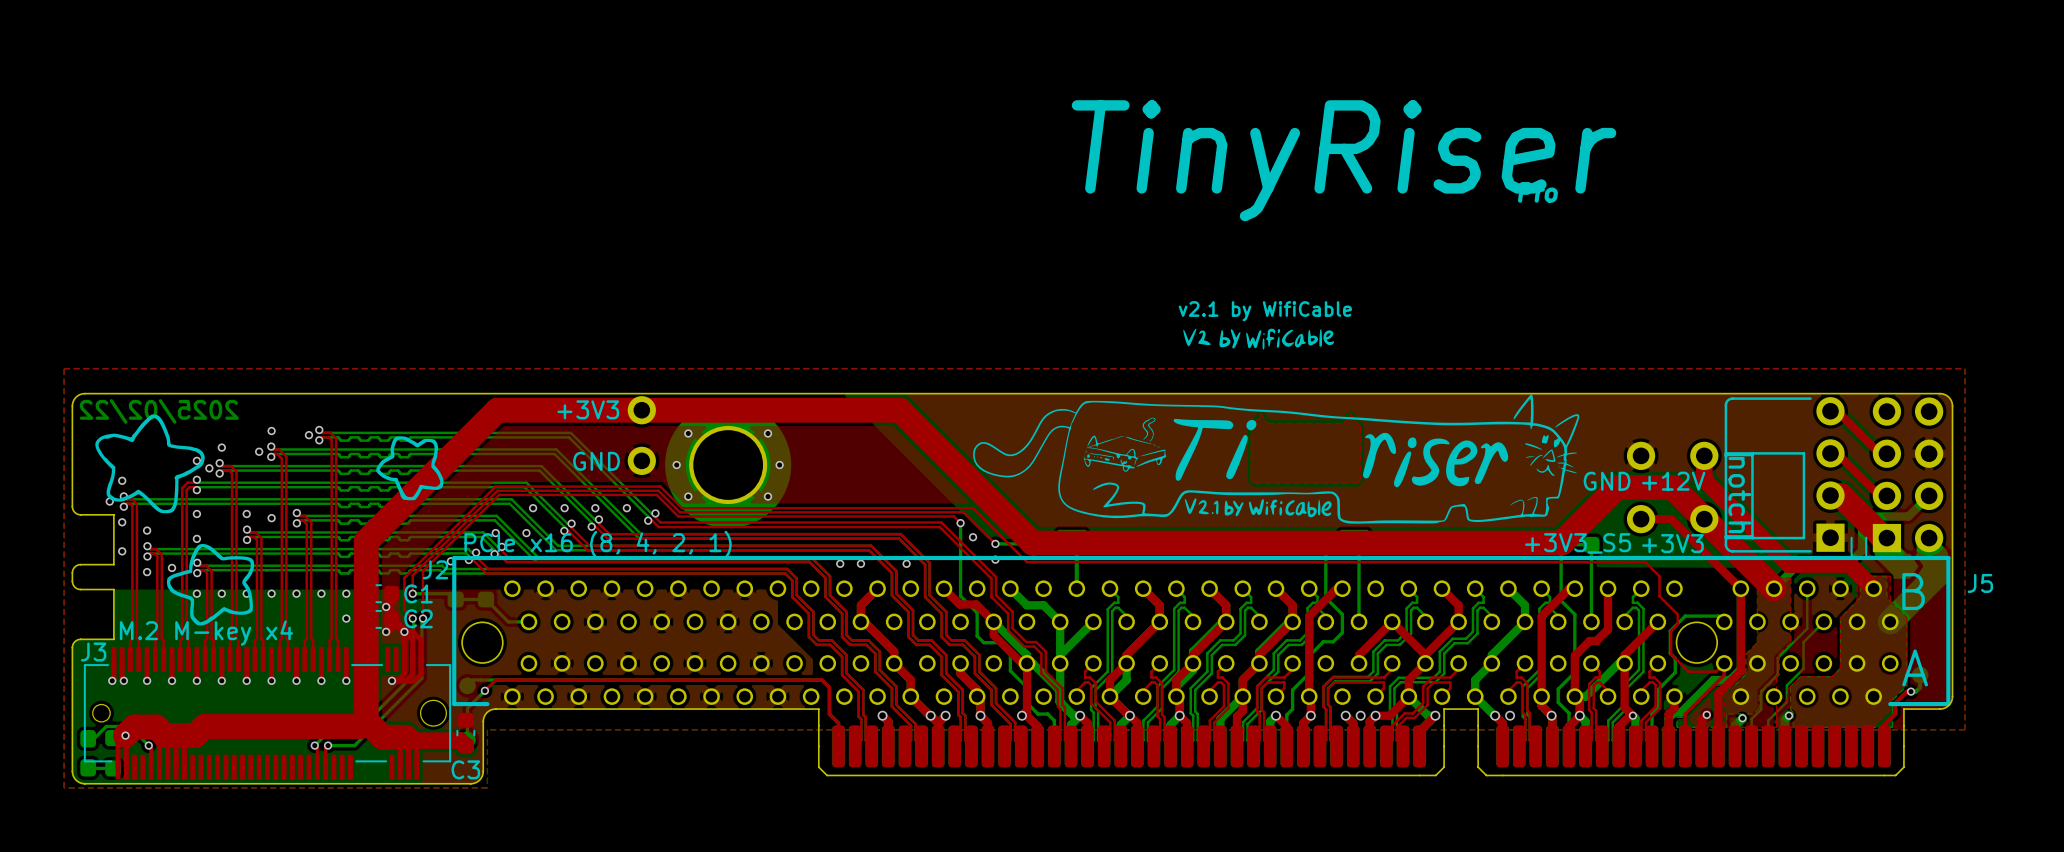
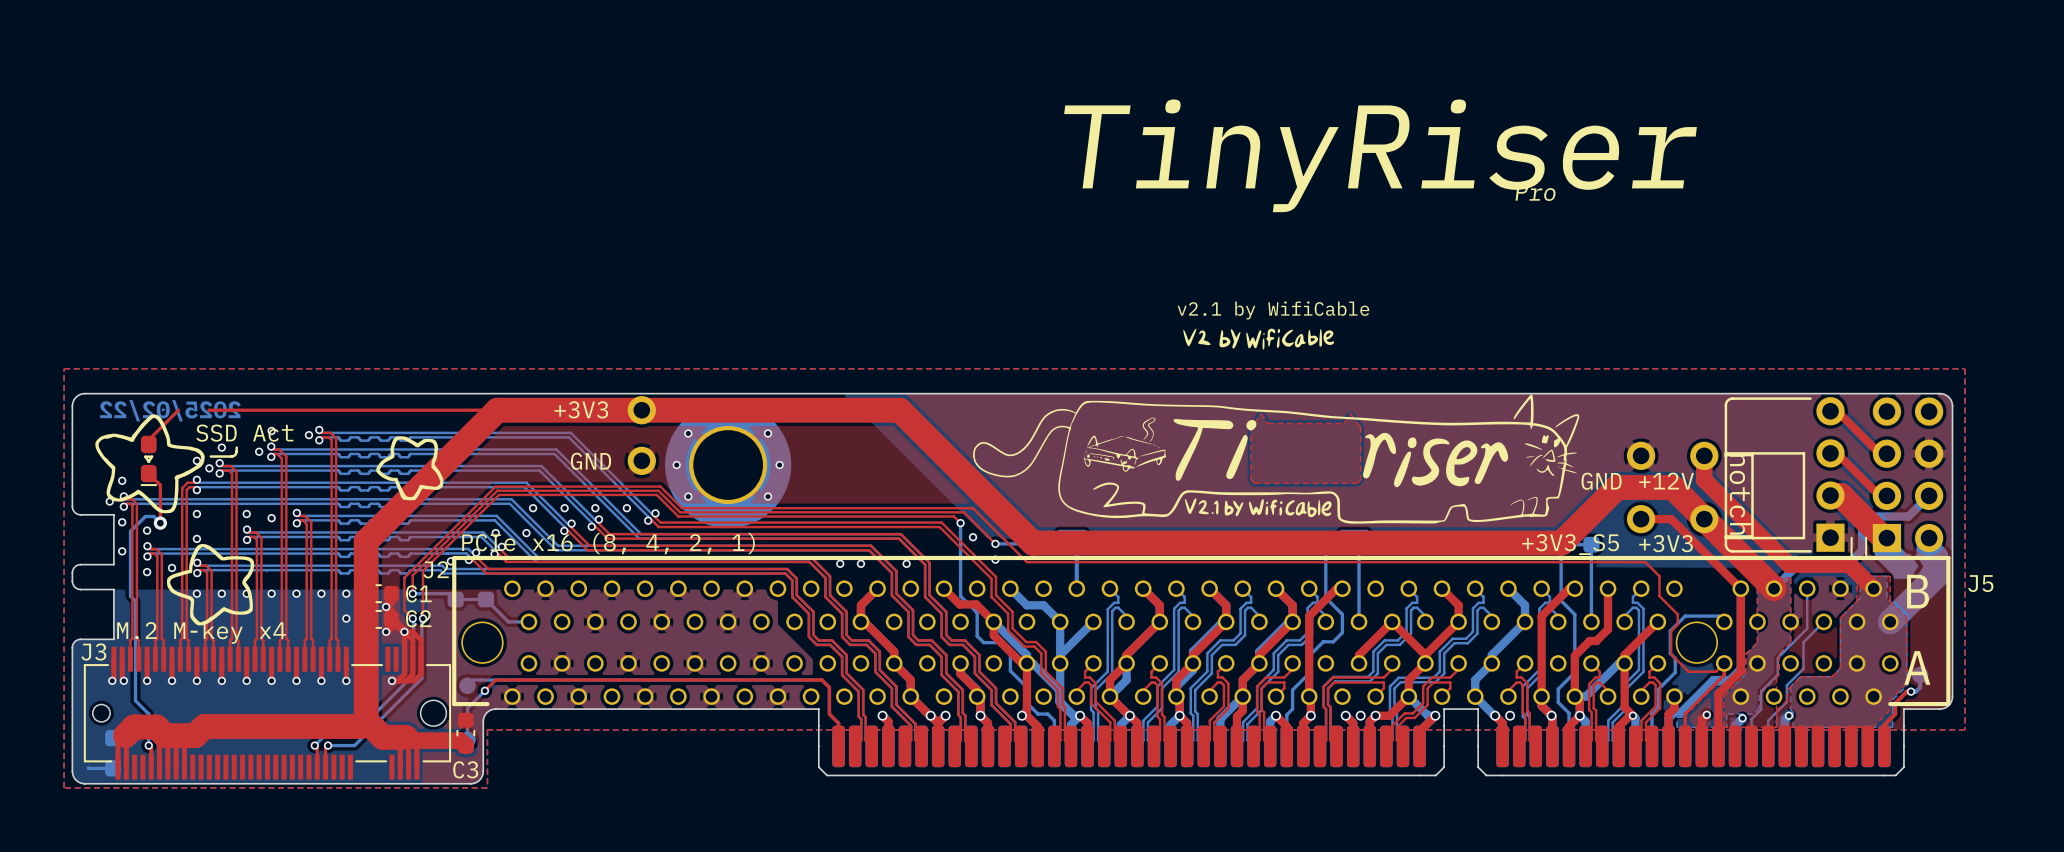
top track: none -> (178, 410) (148, 439) (148, 444)
top track: none -> (208, 410) (497, 410)
text: none -> SSD Act (244, 433)
line: none -> (236, 447) (236, 453) (233, 456) (210, 456)
line: none -> (145, 456) (152, 456) (148, 461) (145, 456)
top track: none -> (148, 473) (160, 485) (160, 523)
via: none -> (160, 523)
via: (125, 735) -> none
bottom track: (88, 738) (94, 738) (106, 726) (129, 726) (148, 745) -> (160, 523) (153, 516) (145, 516) (130, 531) (130, 596) (135, 601) (135, 700) (148, 714) (148, 745)
part side: bottom (88, 753) -> top (148, 460)

